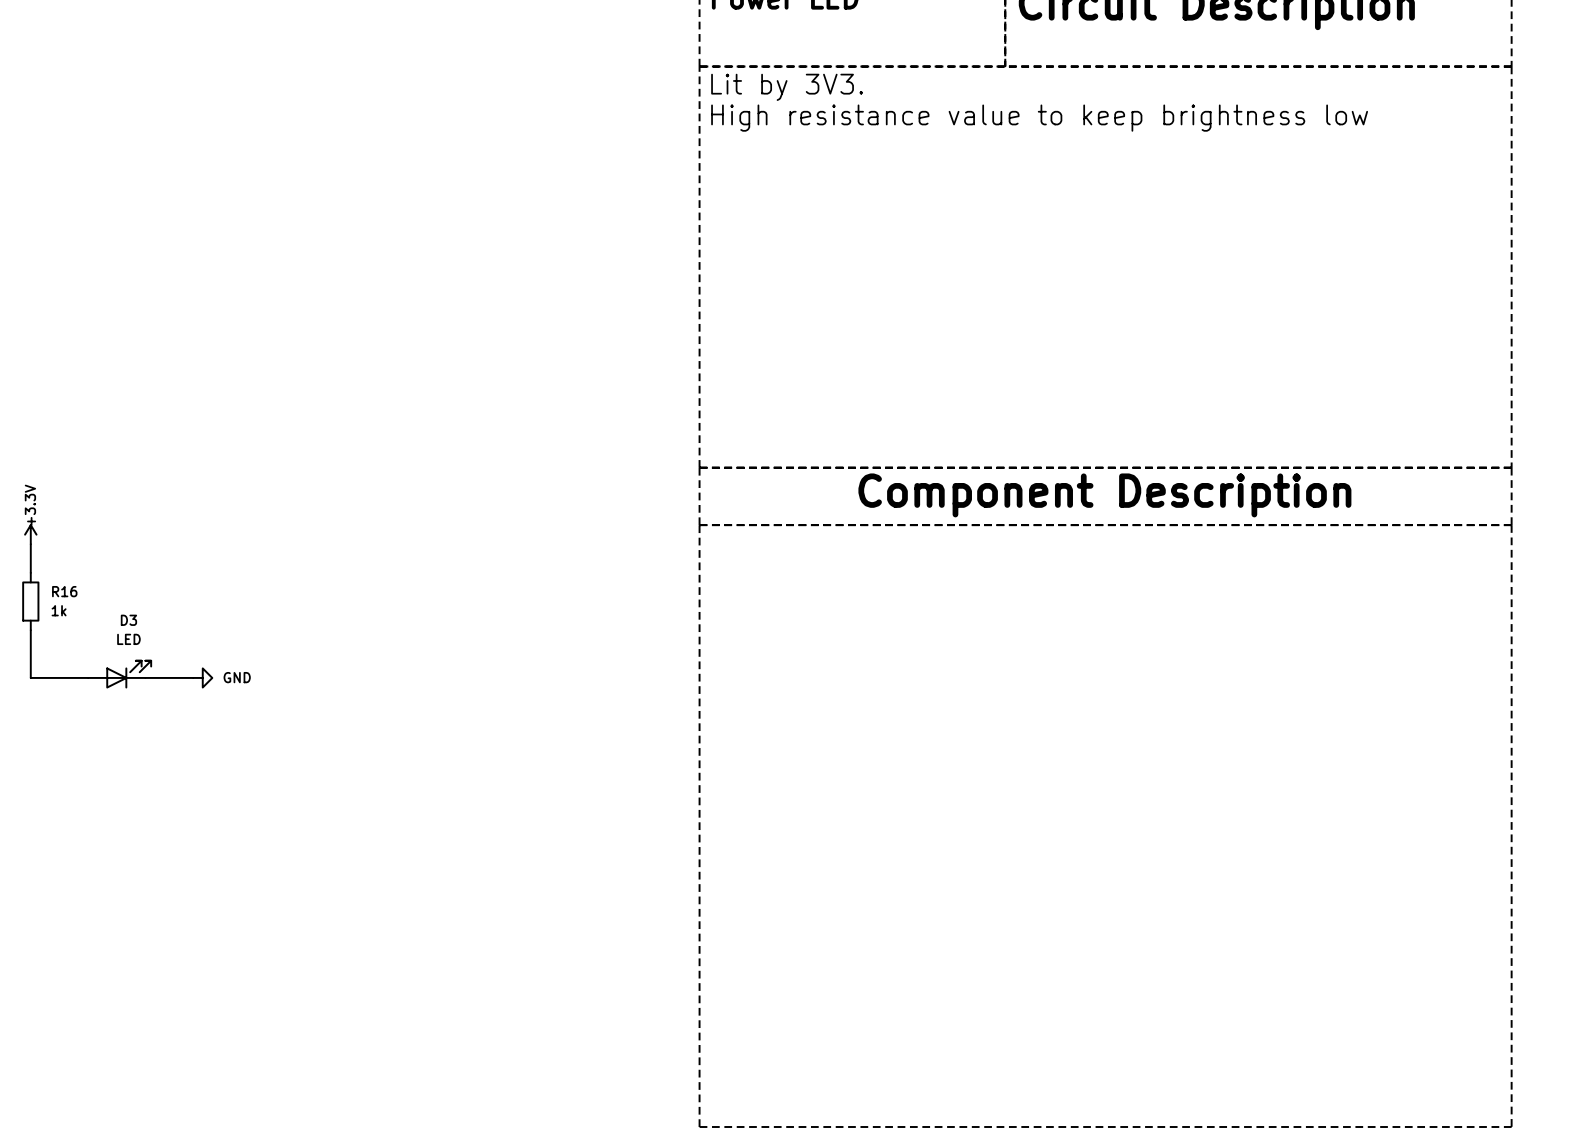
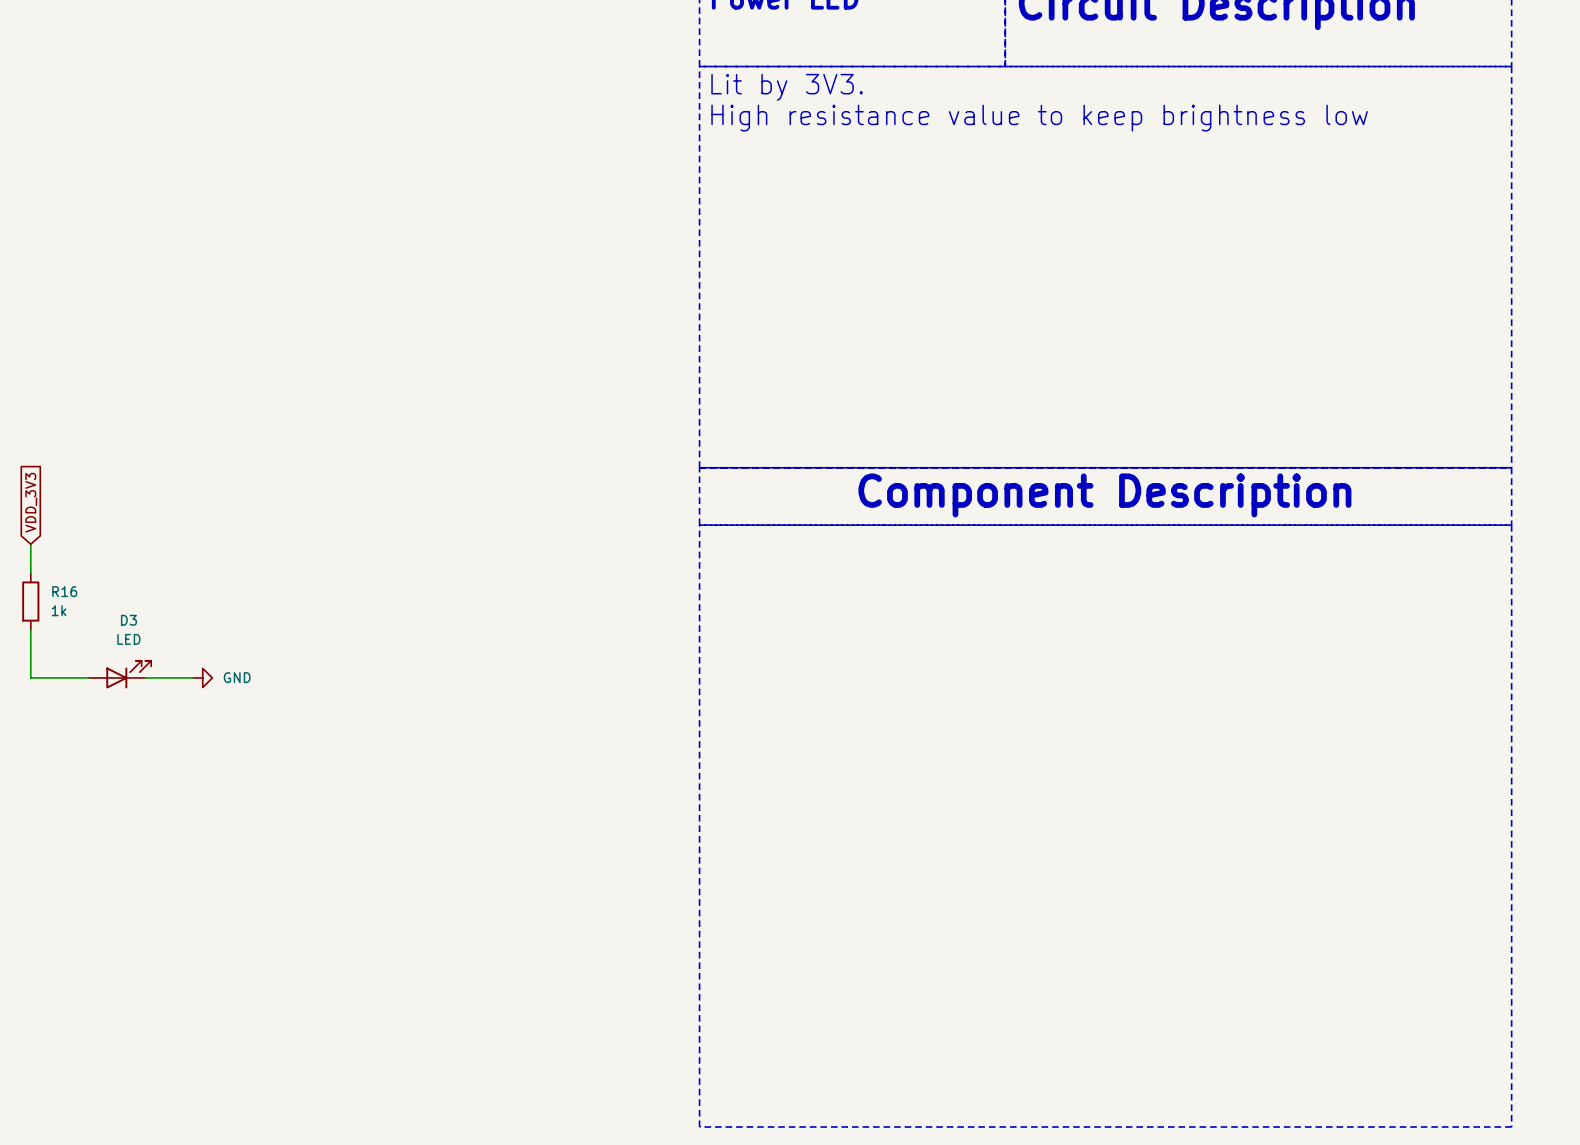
global label: none -> VDD_3V3 (31, 502)
power symbol: +3.3V (30, 534) -> none

